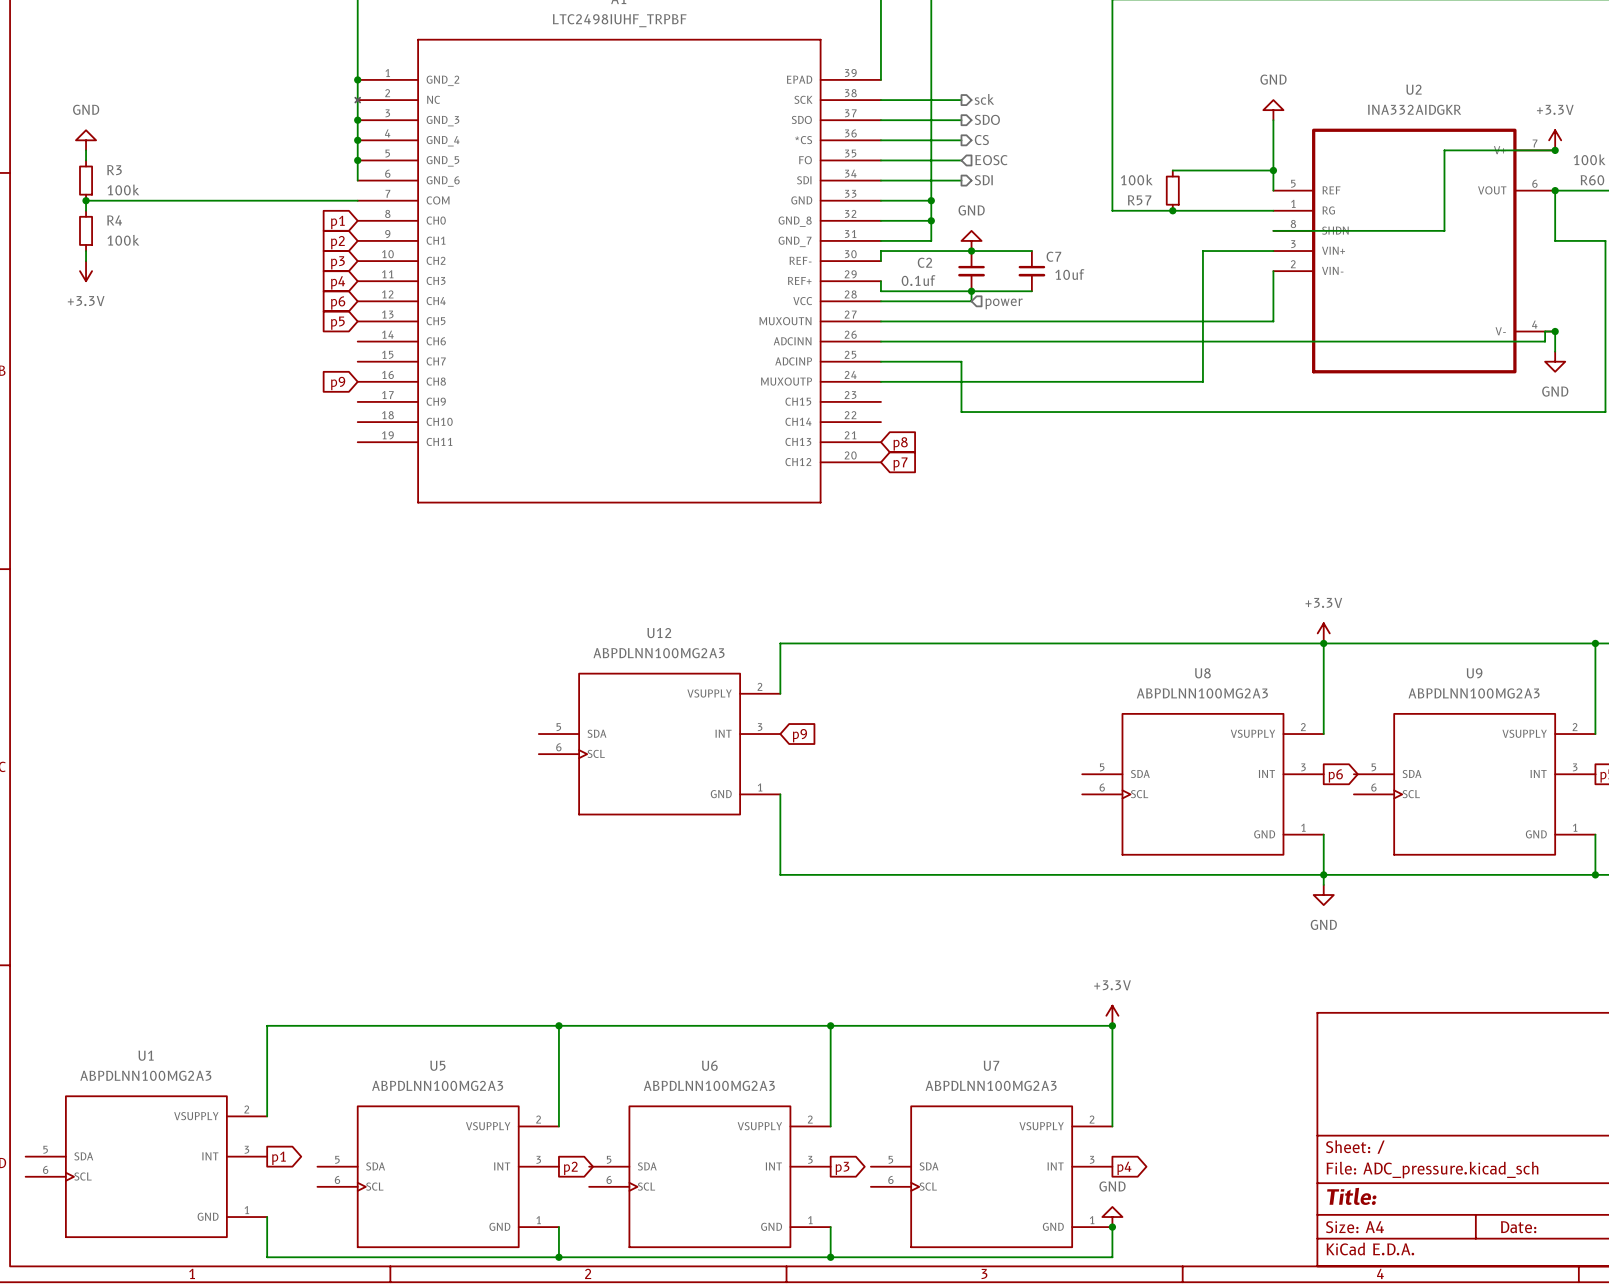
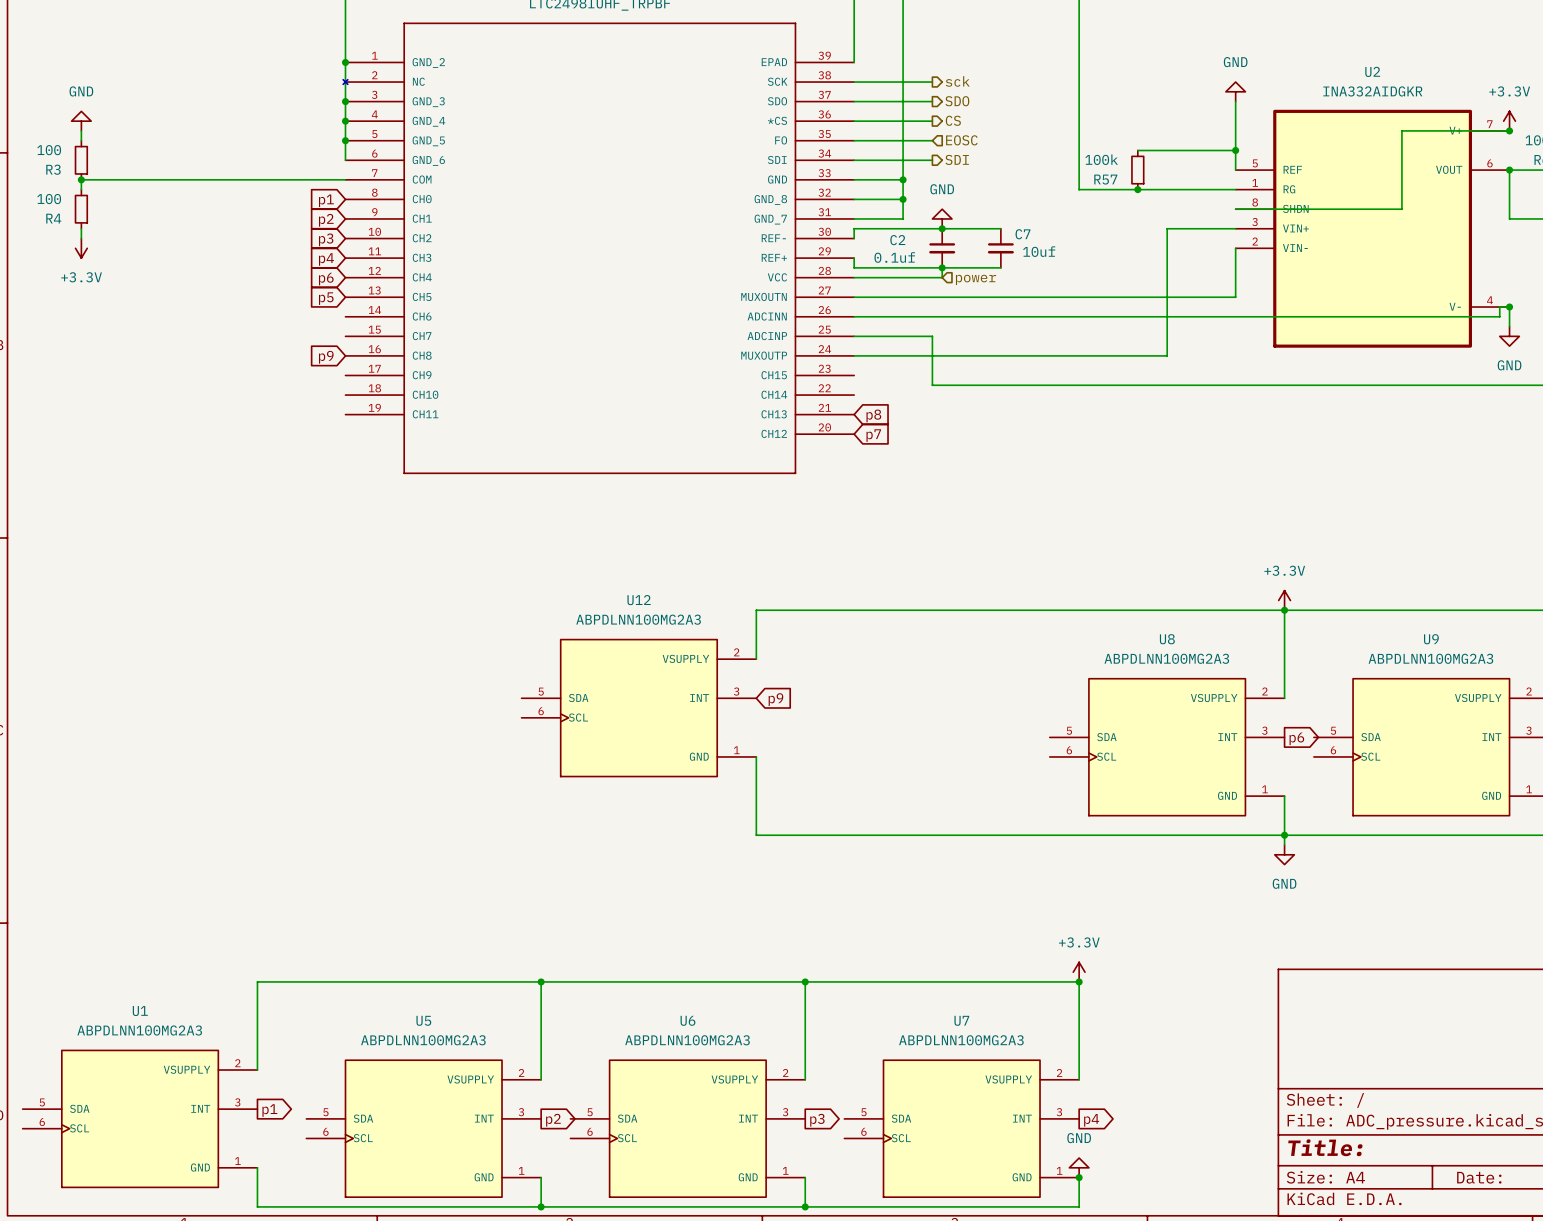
R3 name position: R3 (114, 170) -> R3 (53, 169)
R3 value: 100k (123, 189) -> 100 (49, 150)
R4 name position: R4 (114, 220) -> R4 (53, 218)
R4 value: 100k (123, 240) -> 100 (49, 199)

